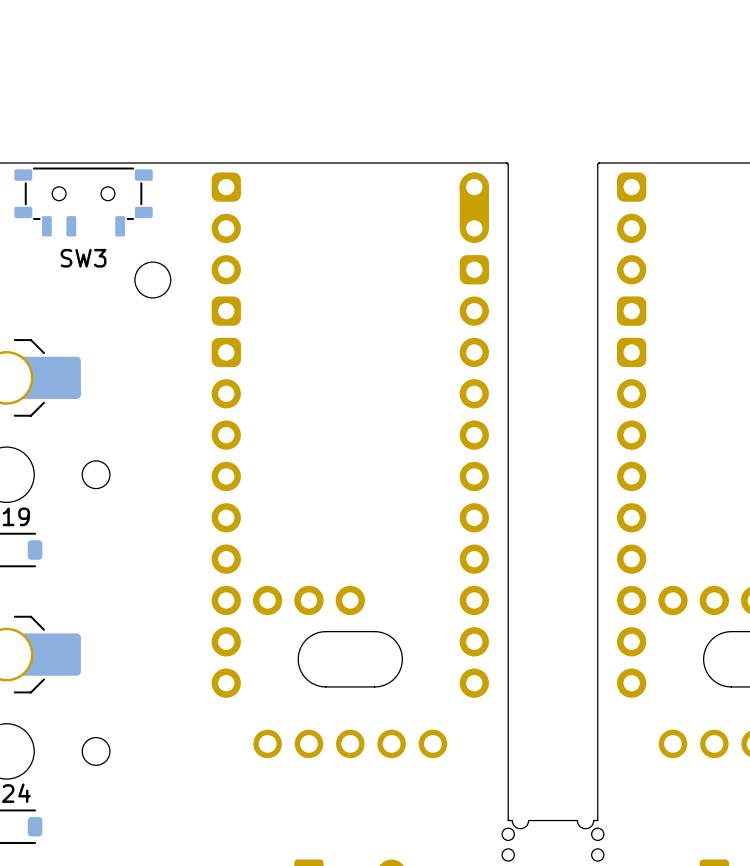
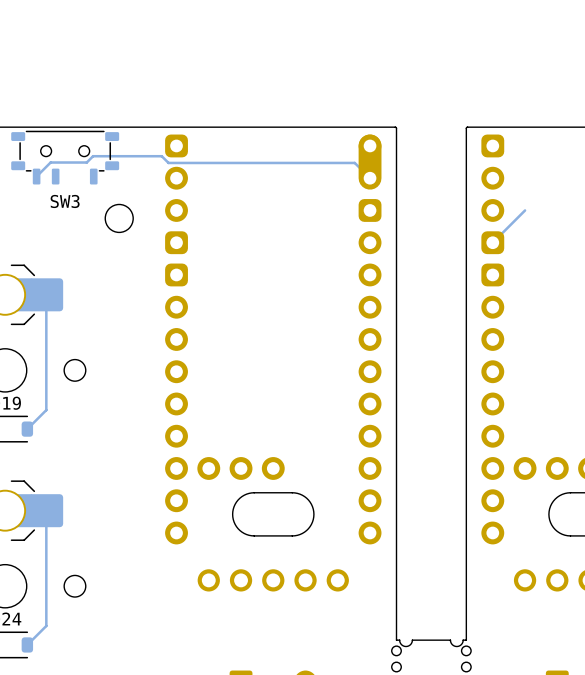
track: none -> (36, 176) (50, 162) (86, 162) (93, 156) (161, 156) (168, 162) (354, 162) (370, 178)
track: none -> (525, 210) (492, 242)
track: none -> (46, 294) (46, 410) (27, 429)
track: none -> (46, 510) (46, 625) (27, 644)

